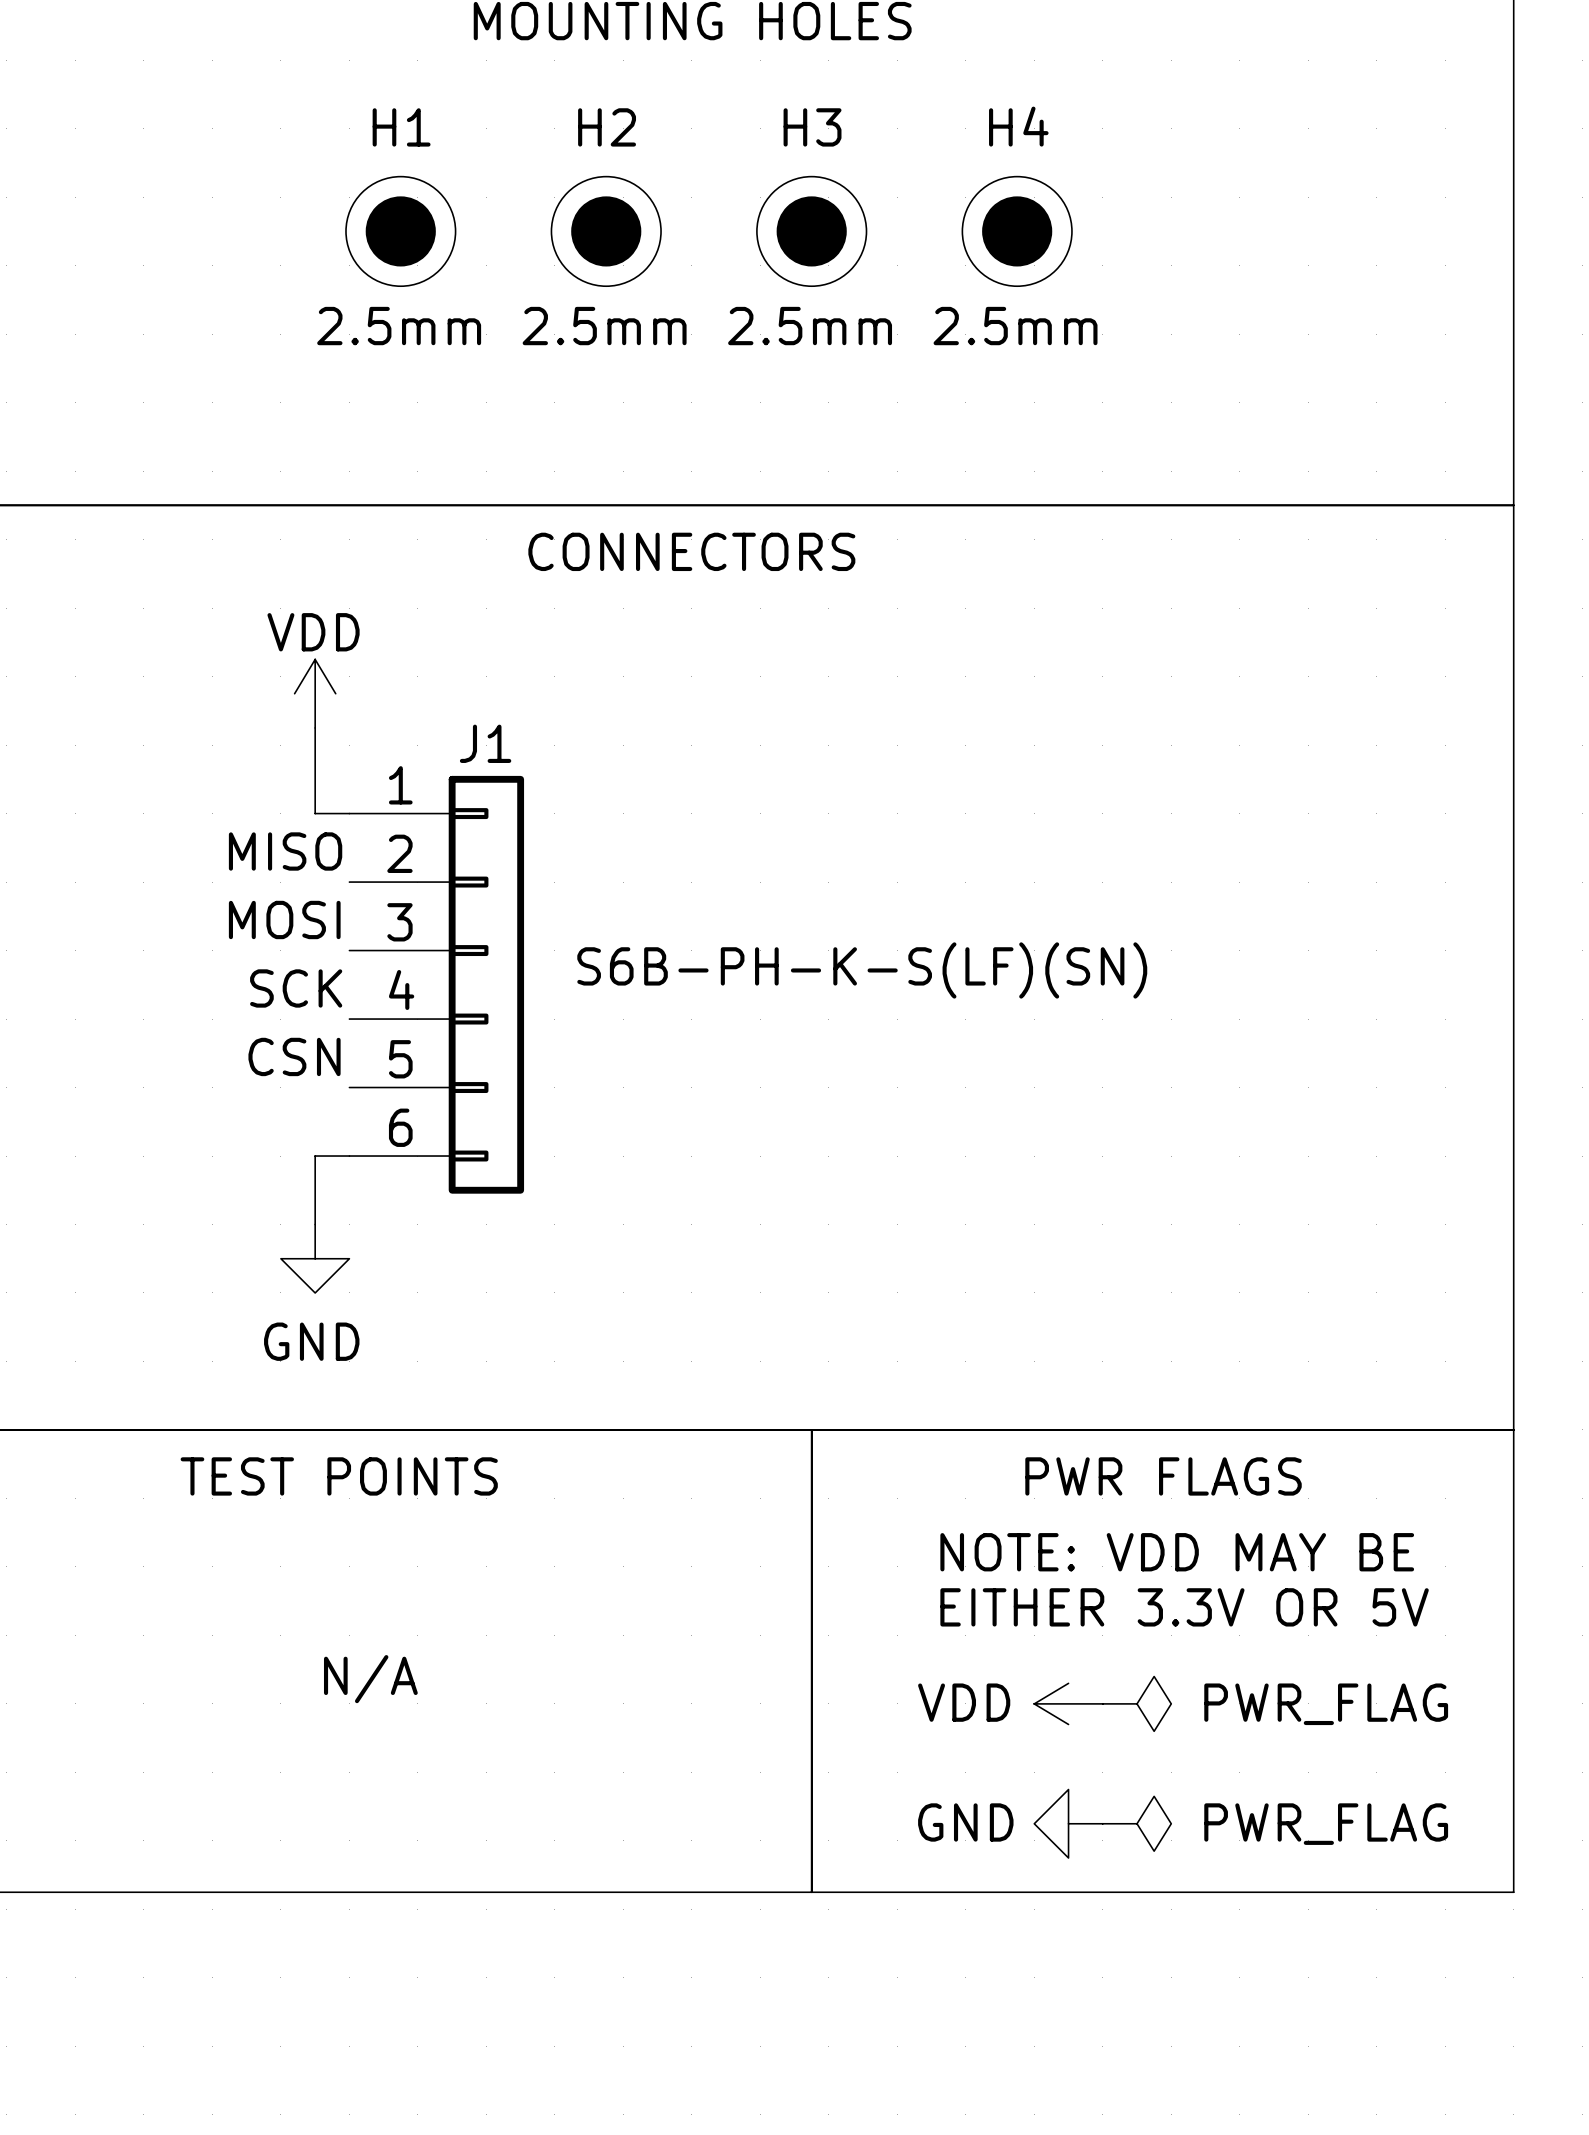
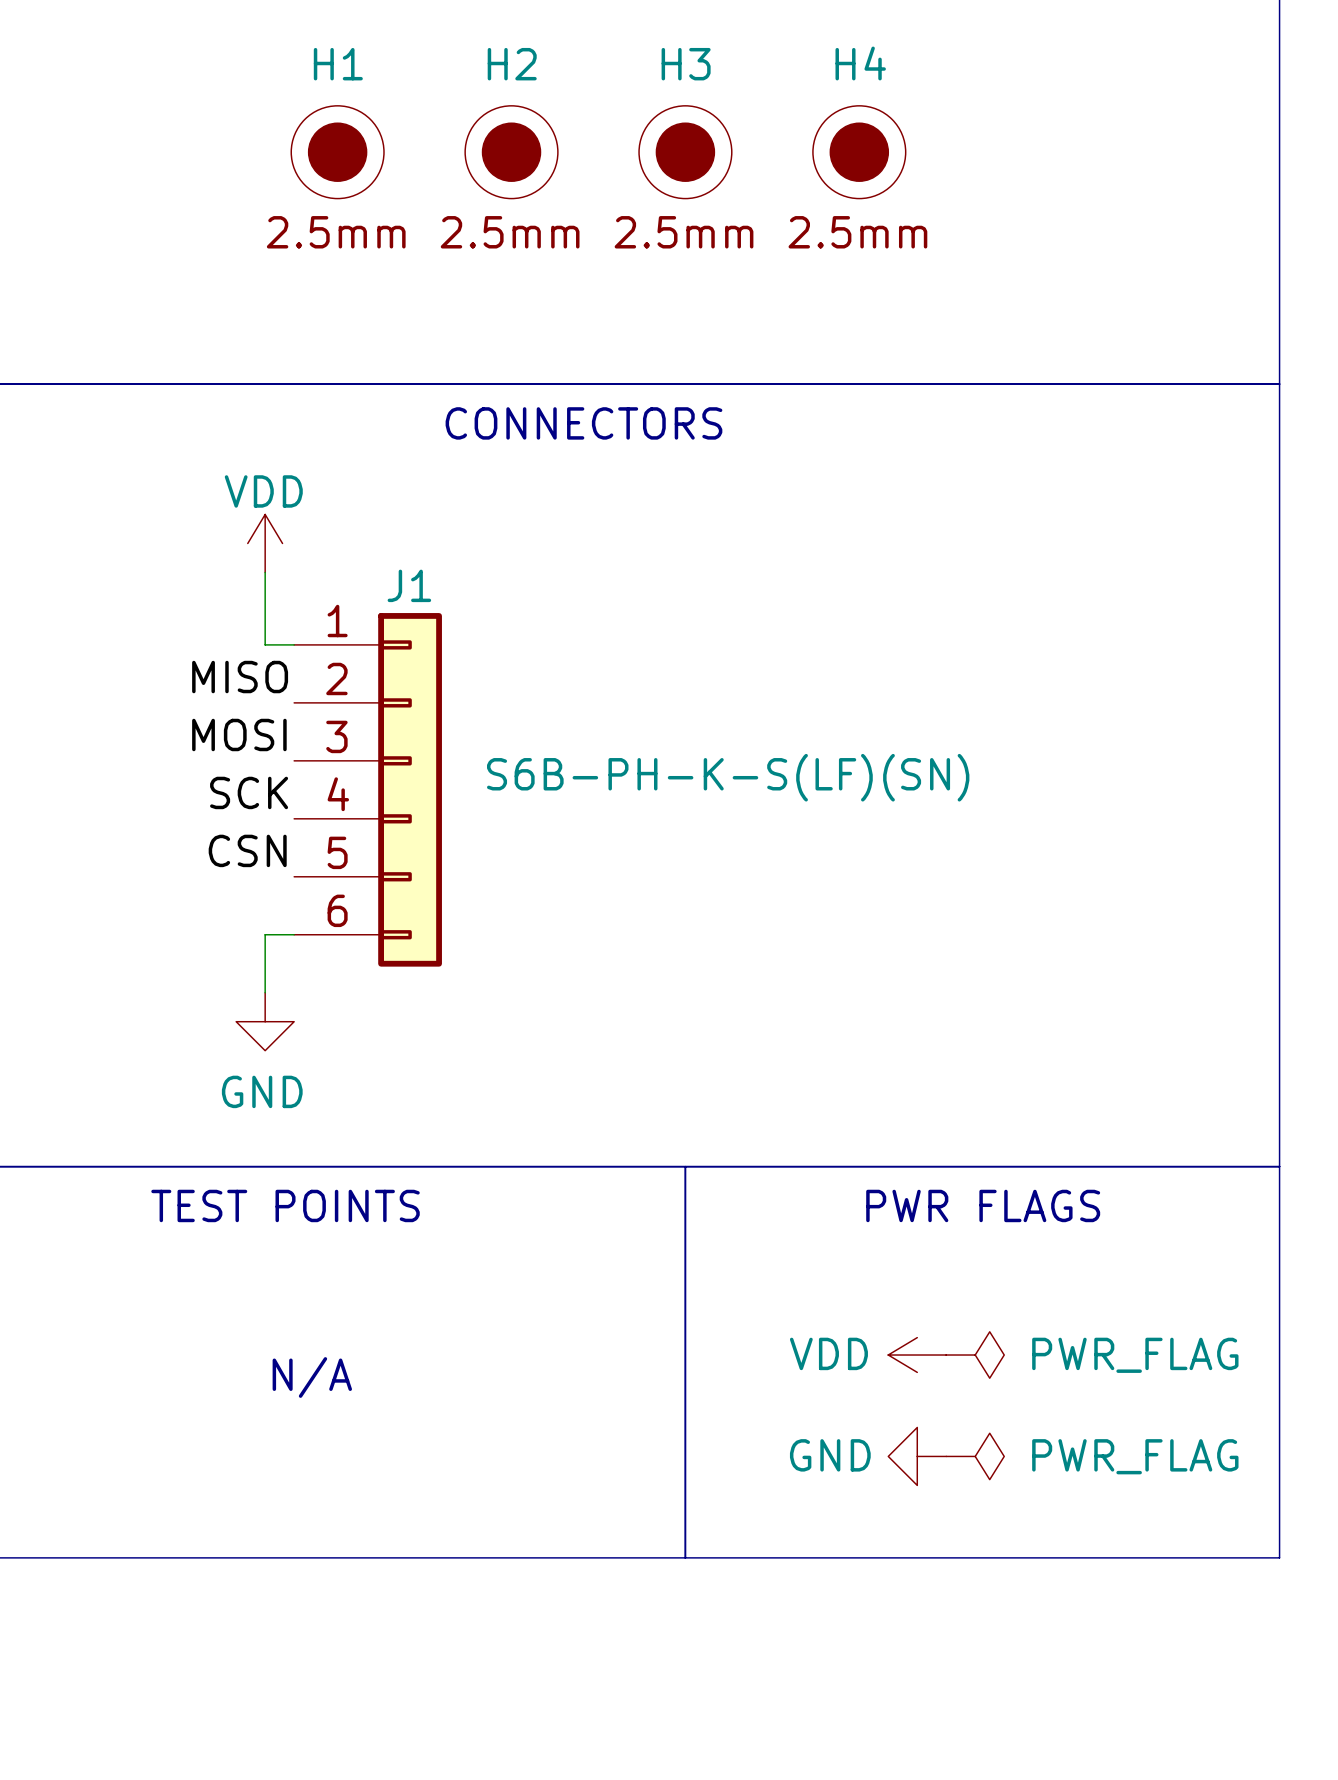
text: NOTE: VDD MAY BE (1177, 1552) -> none
text: EITHER 3.3V OR 5V (1184, 1607) -> none
power symbol: none -> PWR_FLAG (975, 1355)
power symbol position: VDD (1068, 1703) -> VDD (917, 1355)
power symbol: PWR_FLAG (1137, 1703) -> none
power symbol: none -> PWR_FLAG (975, 1456)
power symbol position: GND (1068, 1823) -> GND (917, 1456)
power symbol: PWR_FLAG (1137, 1823) -> none

